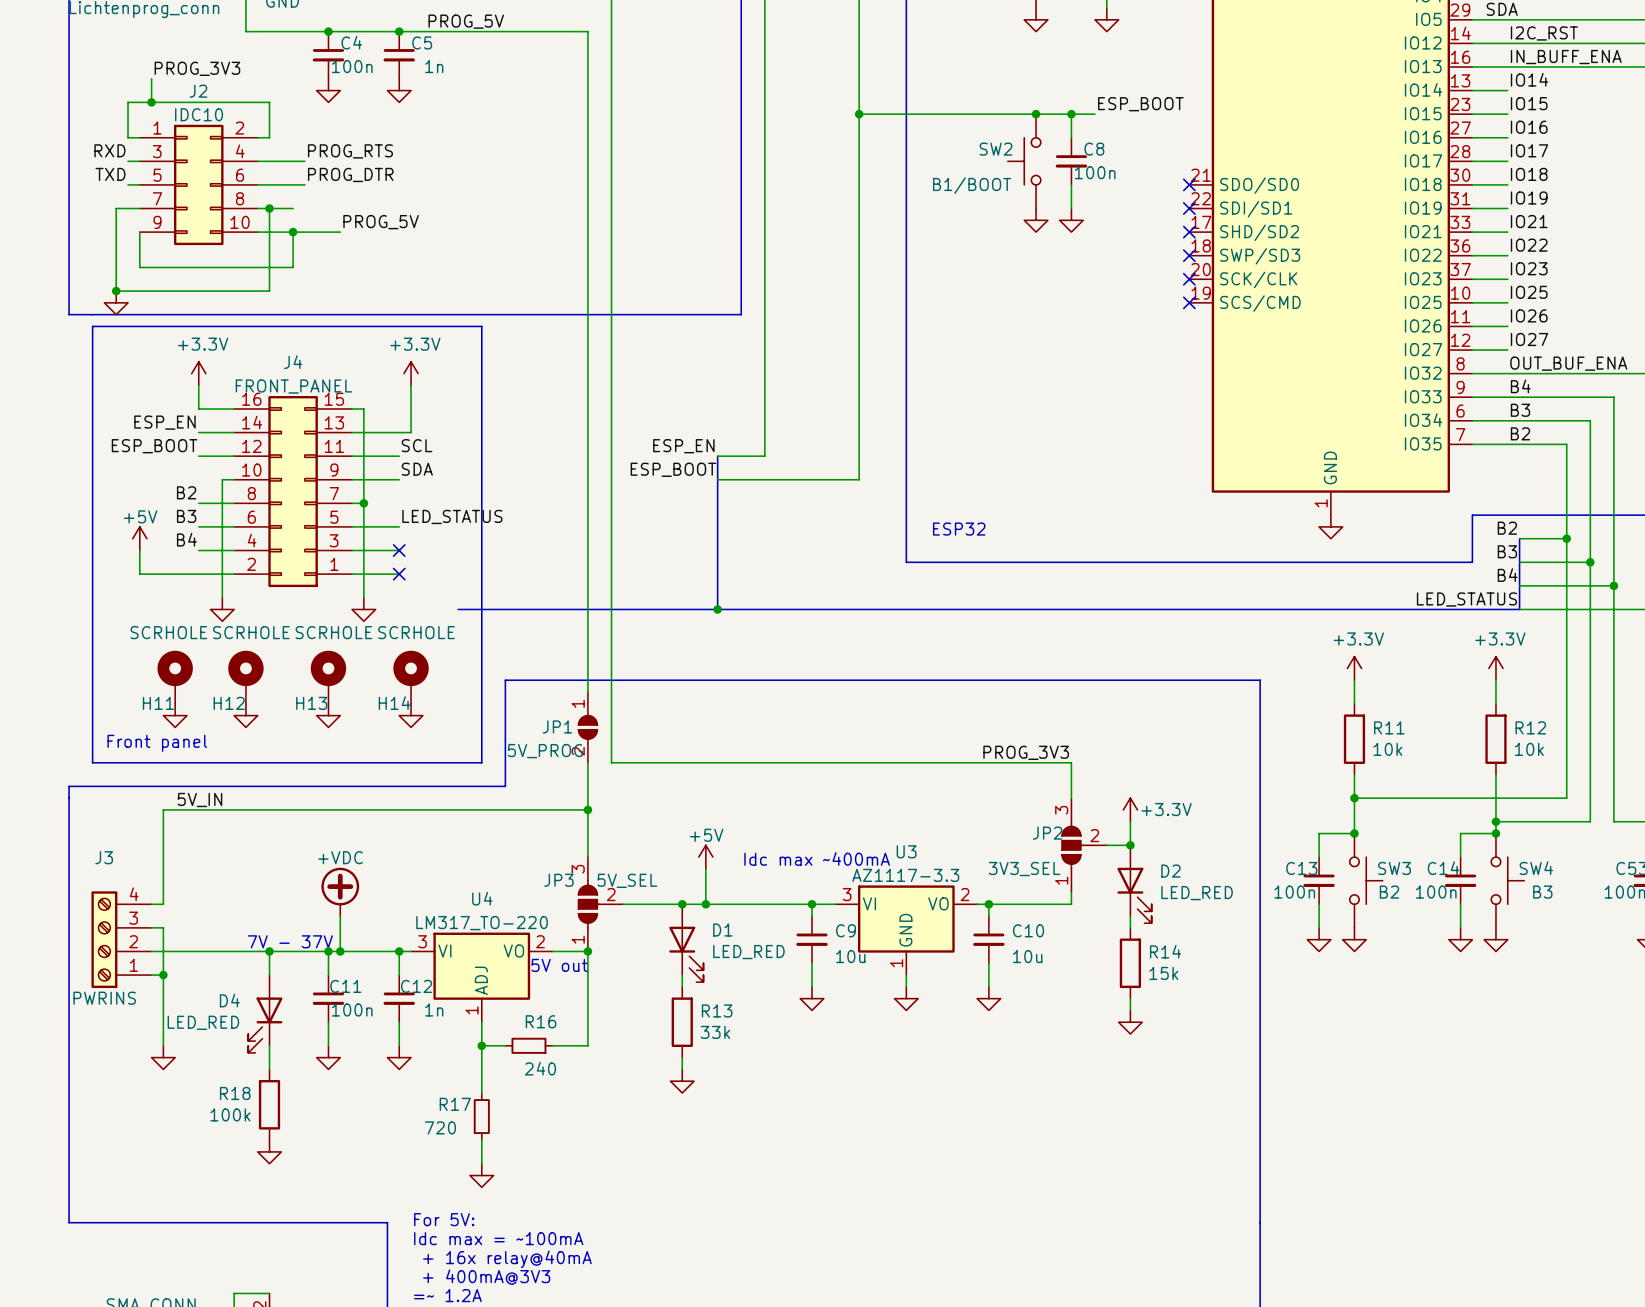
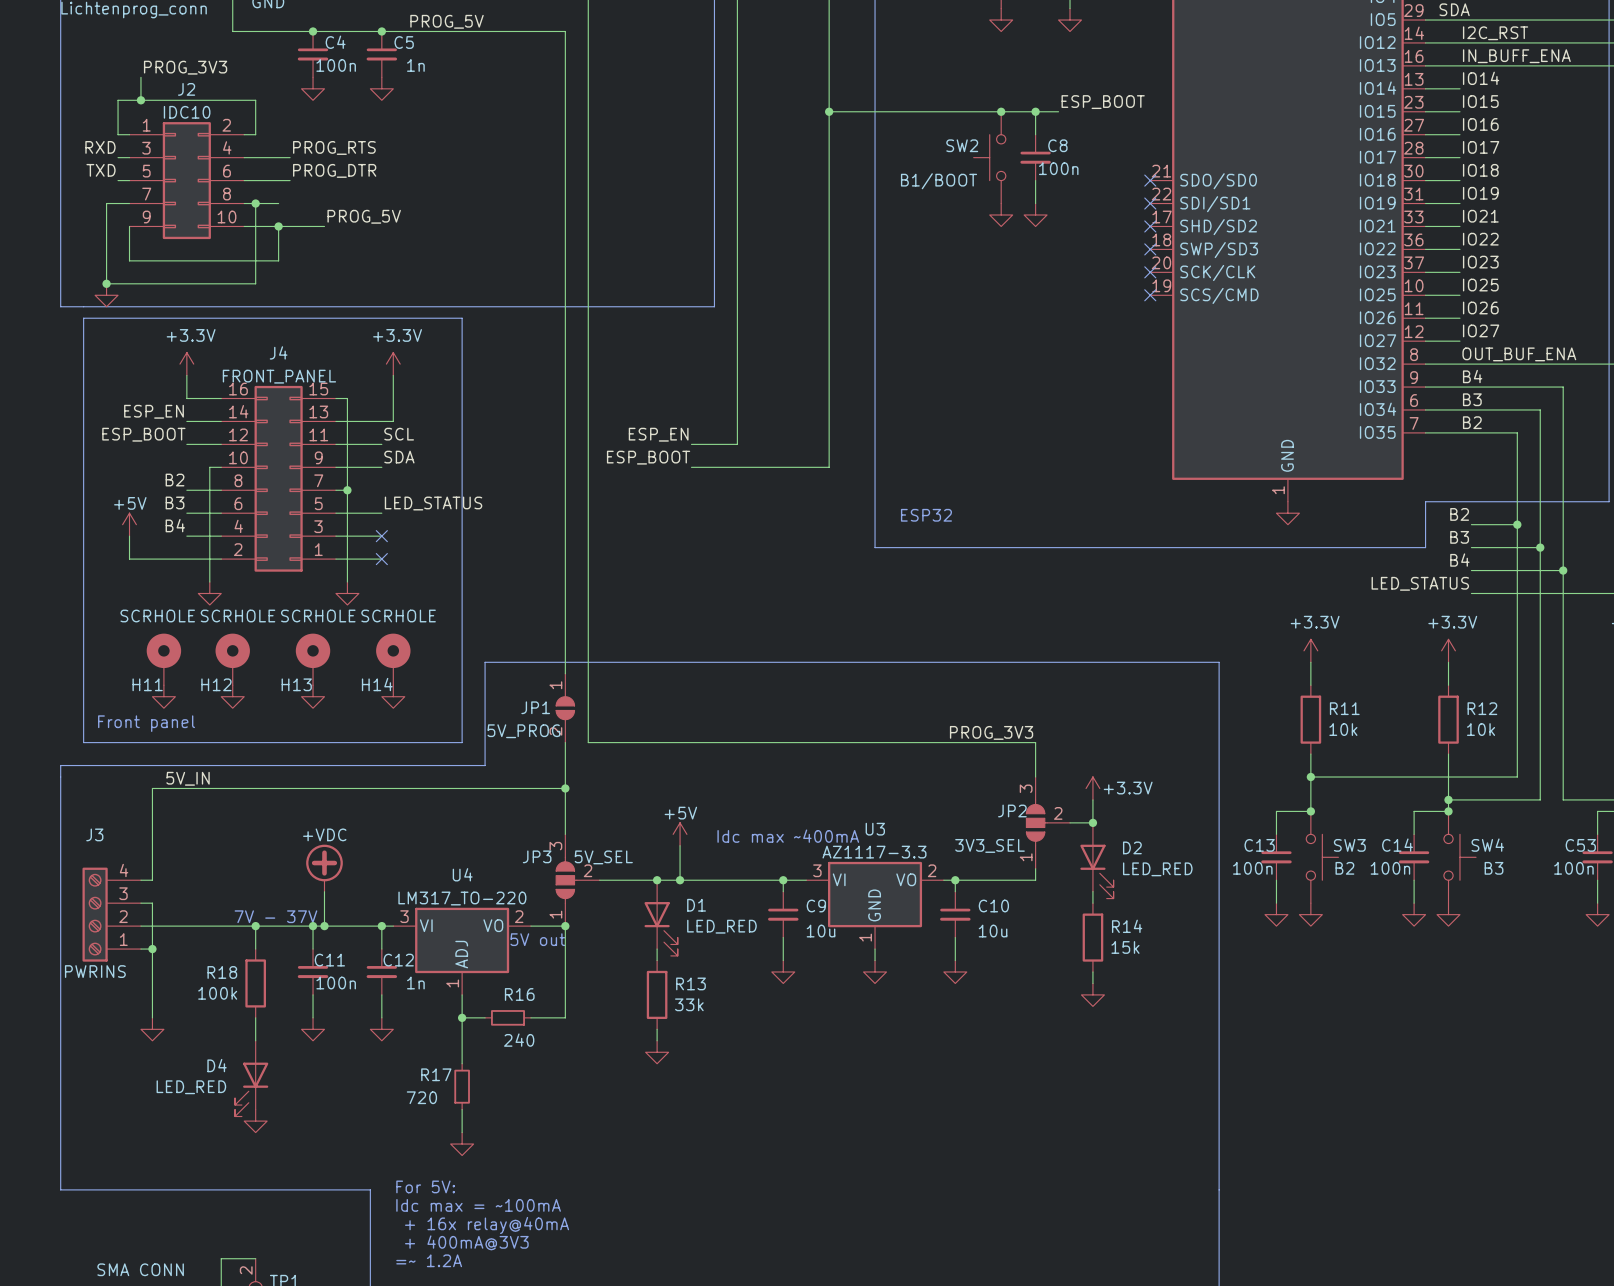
bus: (717, 456) (717, 609) -> none
bus: (1519, 538) (1519, 609) (458, 609) -> none
junction: (717, 609) -> none
D4 position: (265, 1013) -> (251, 1078)
R18 position: (269, 1104) -> (255, 983)

